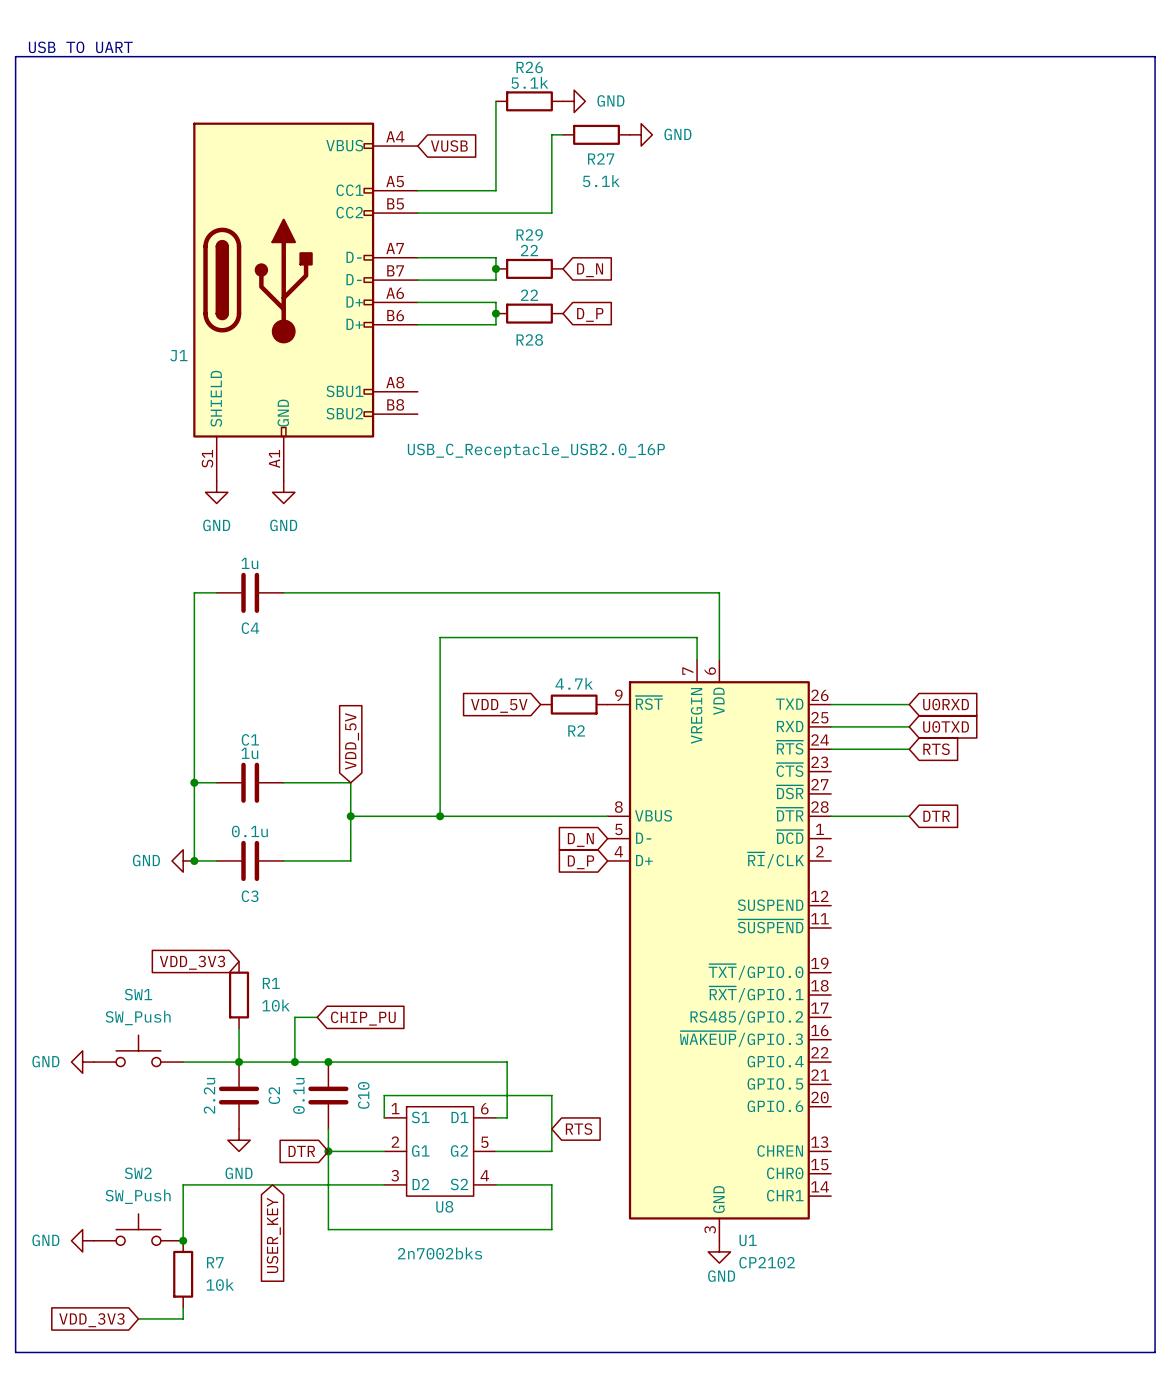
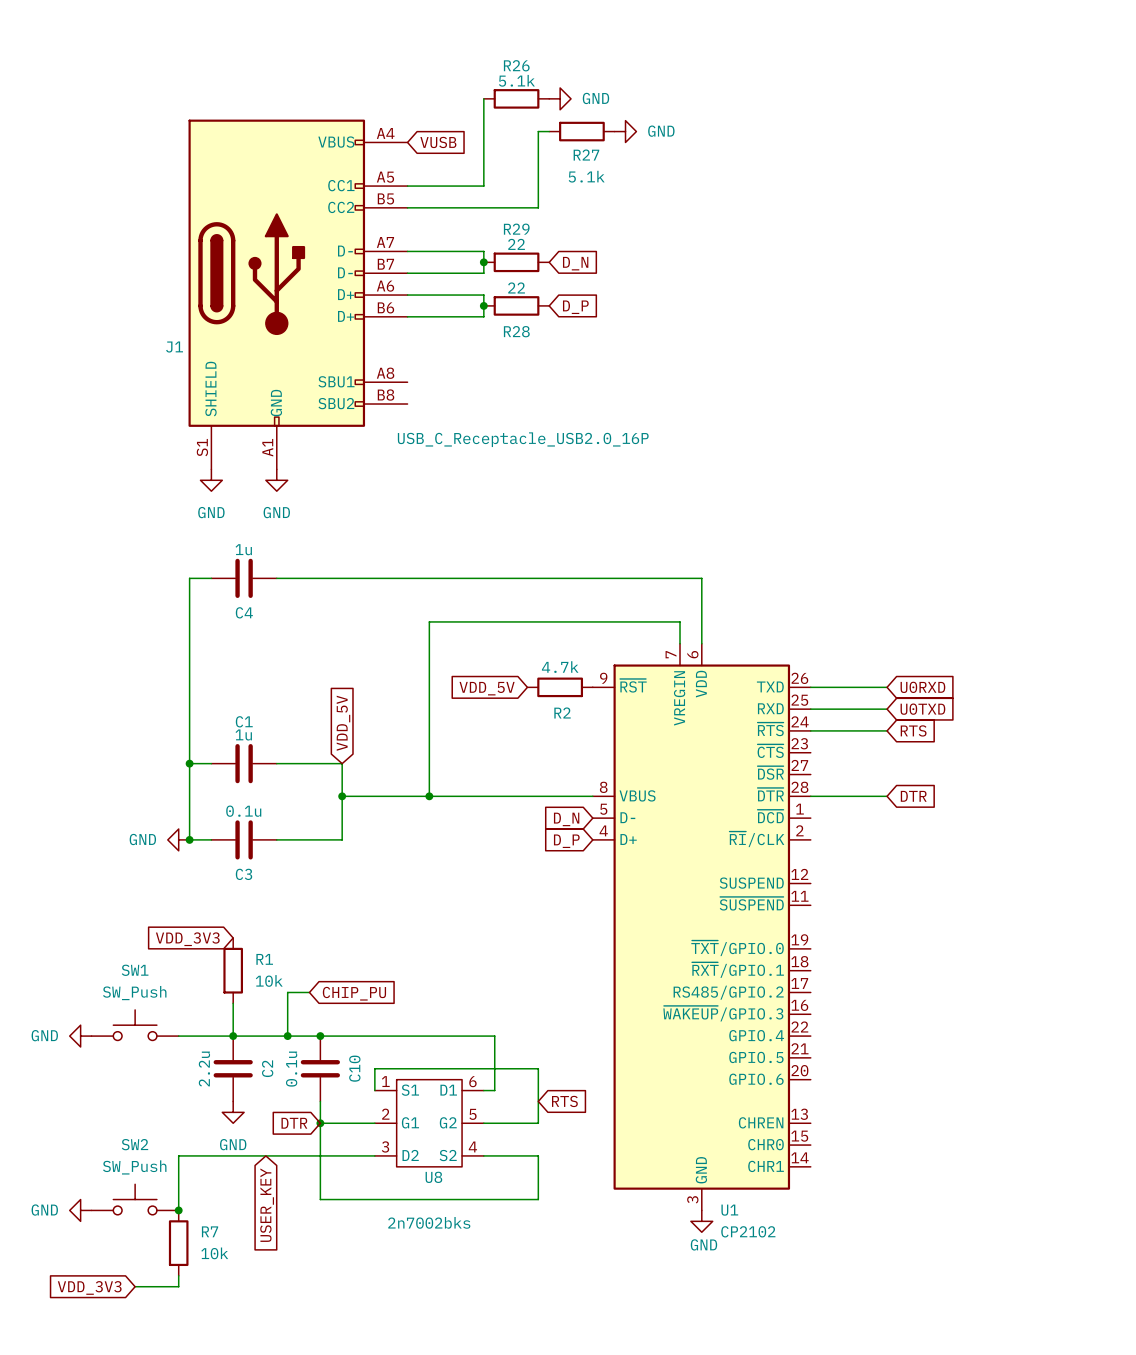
text: USB TO UART (80, 47) -> none
line: (15, 56) (1155, 56) (1155, 1352) (15, 1352) (15, 56) -> none

